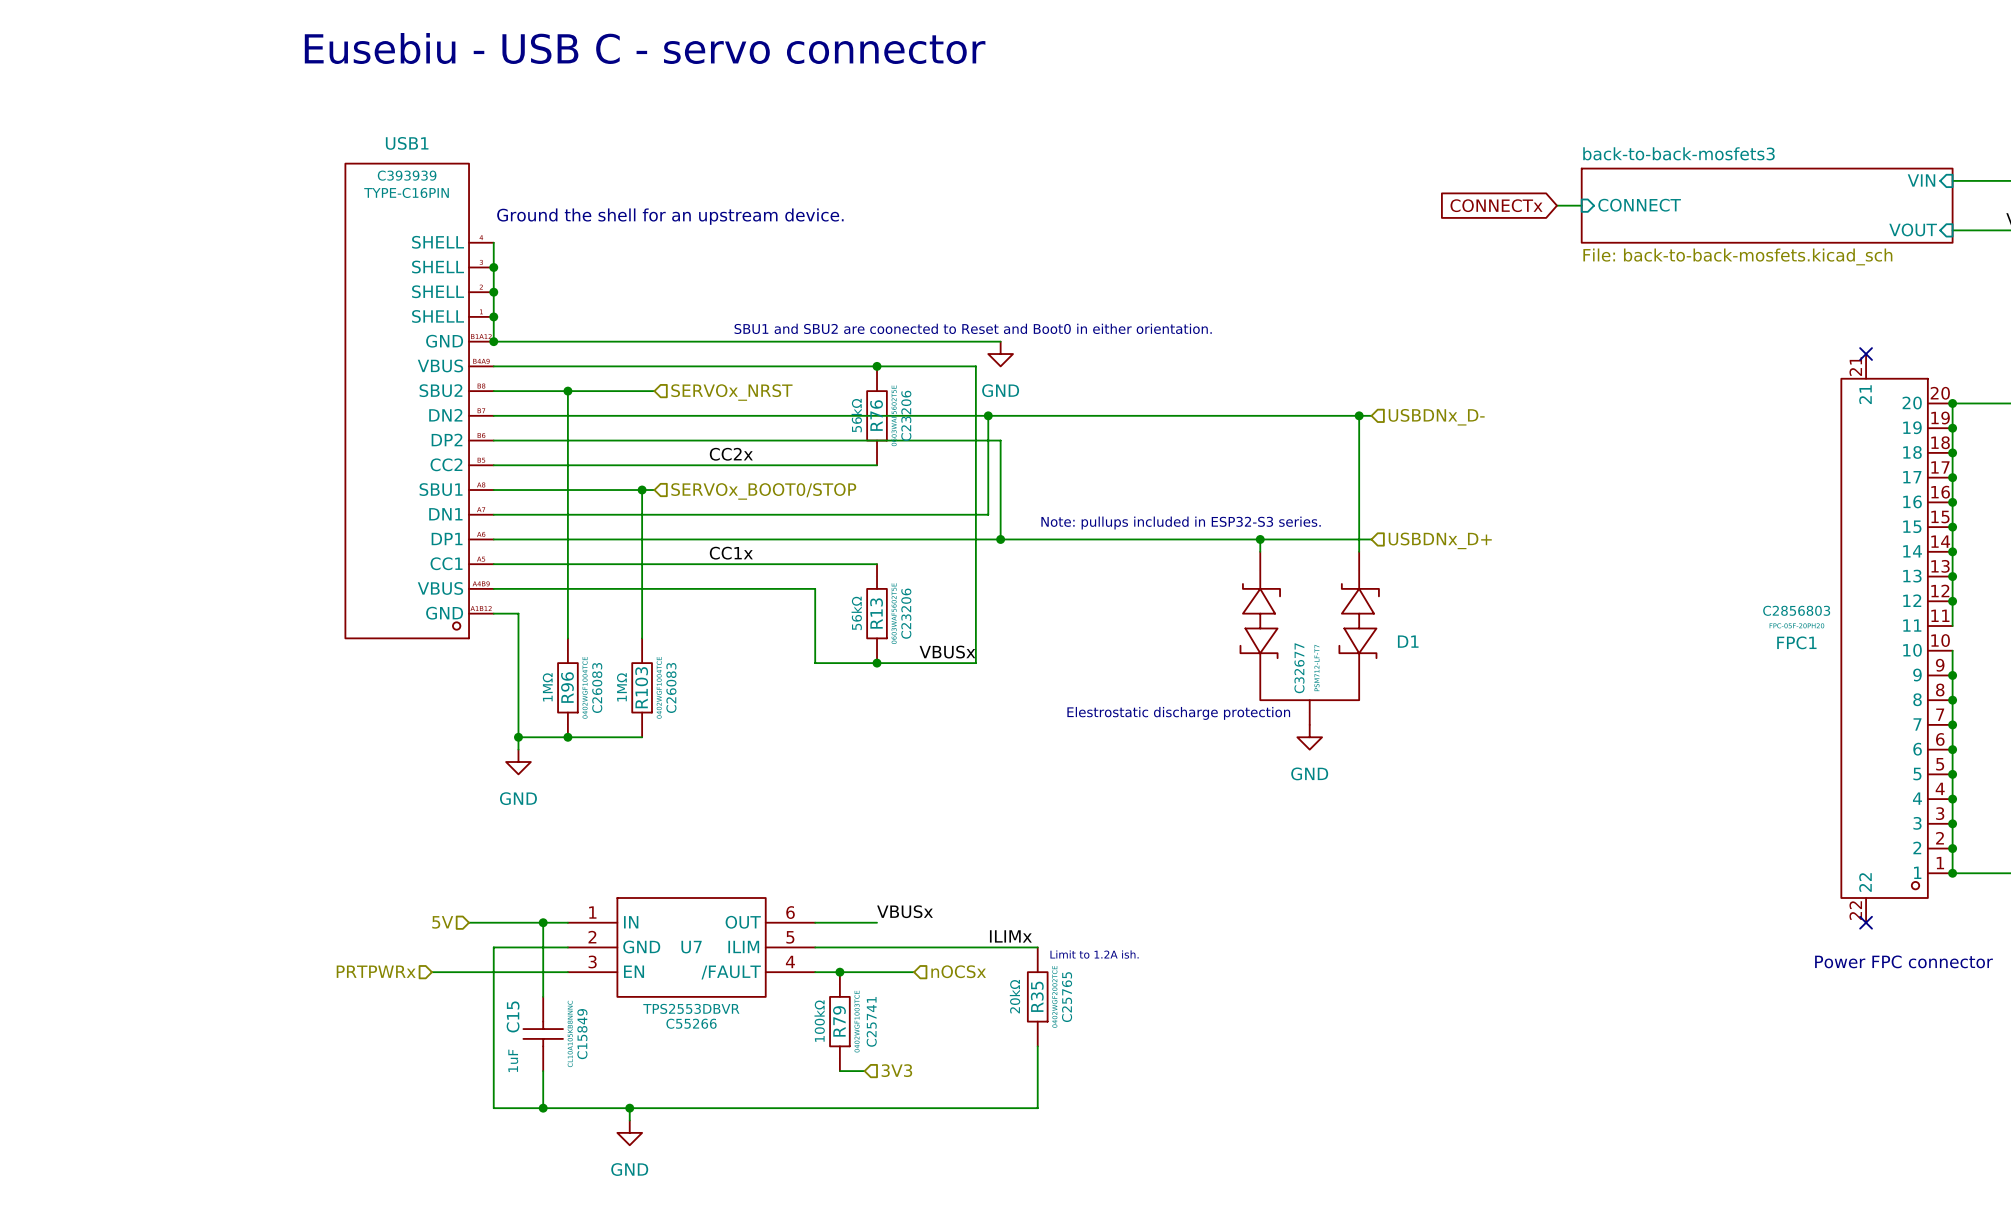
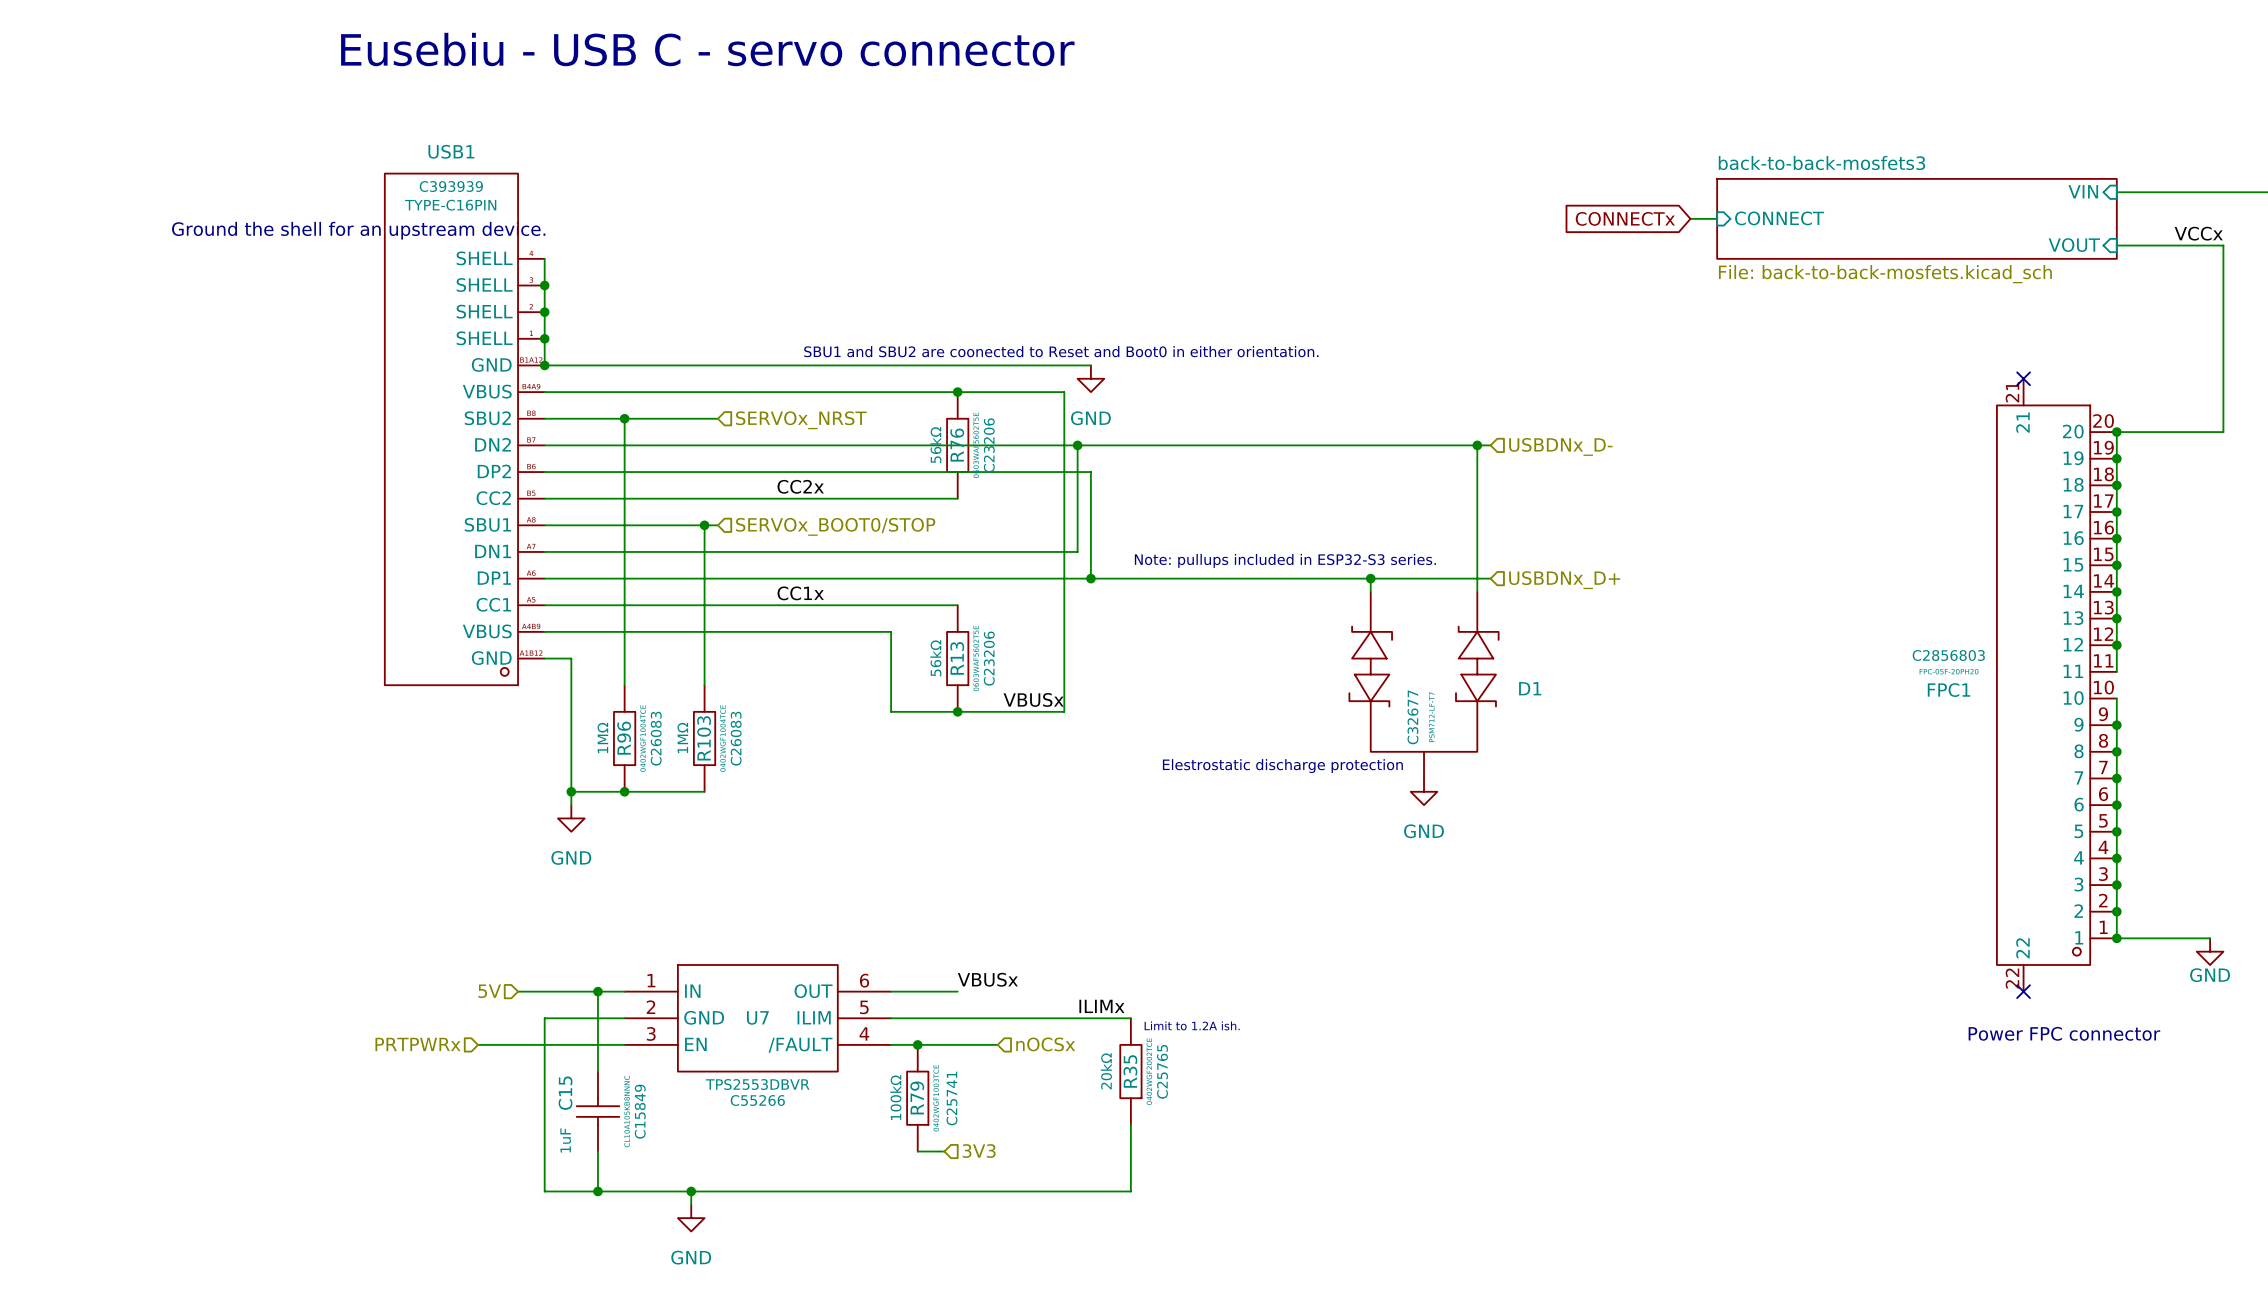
text position: Ground the shell for an upstream device. (670, 216) -> Ground the shell for an upstream device. (358, 230)

